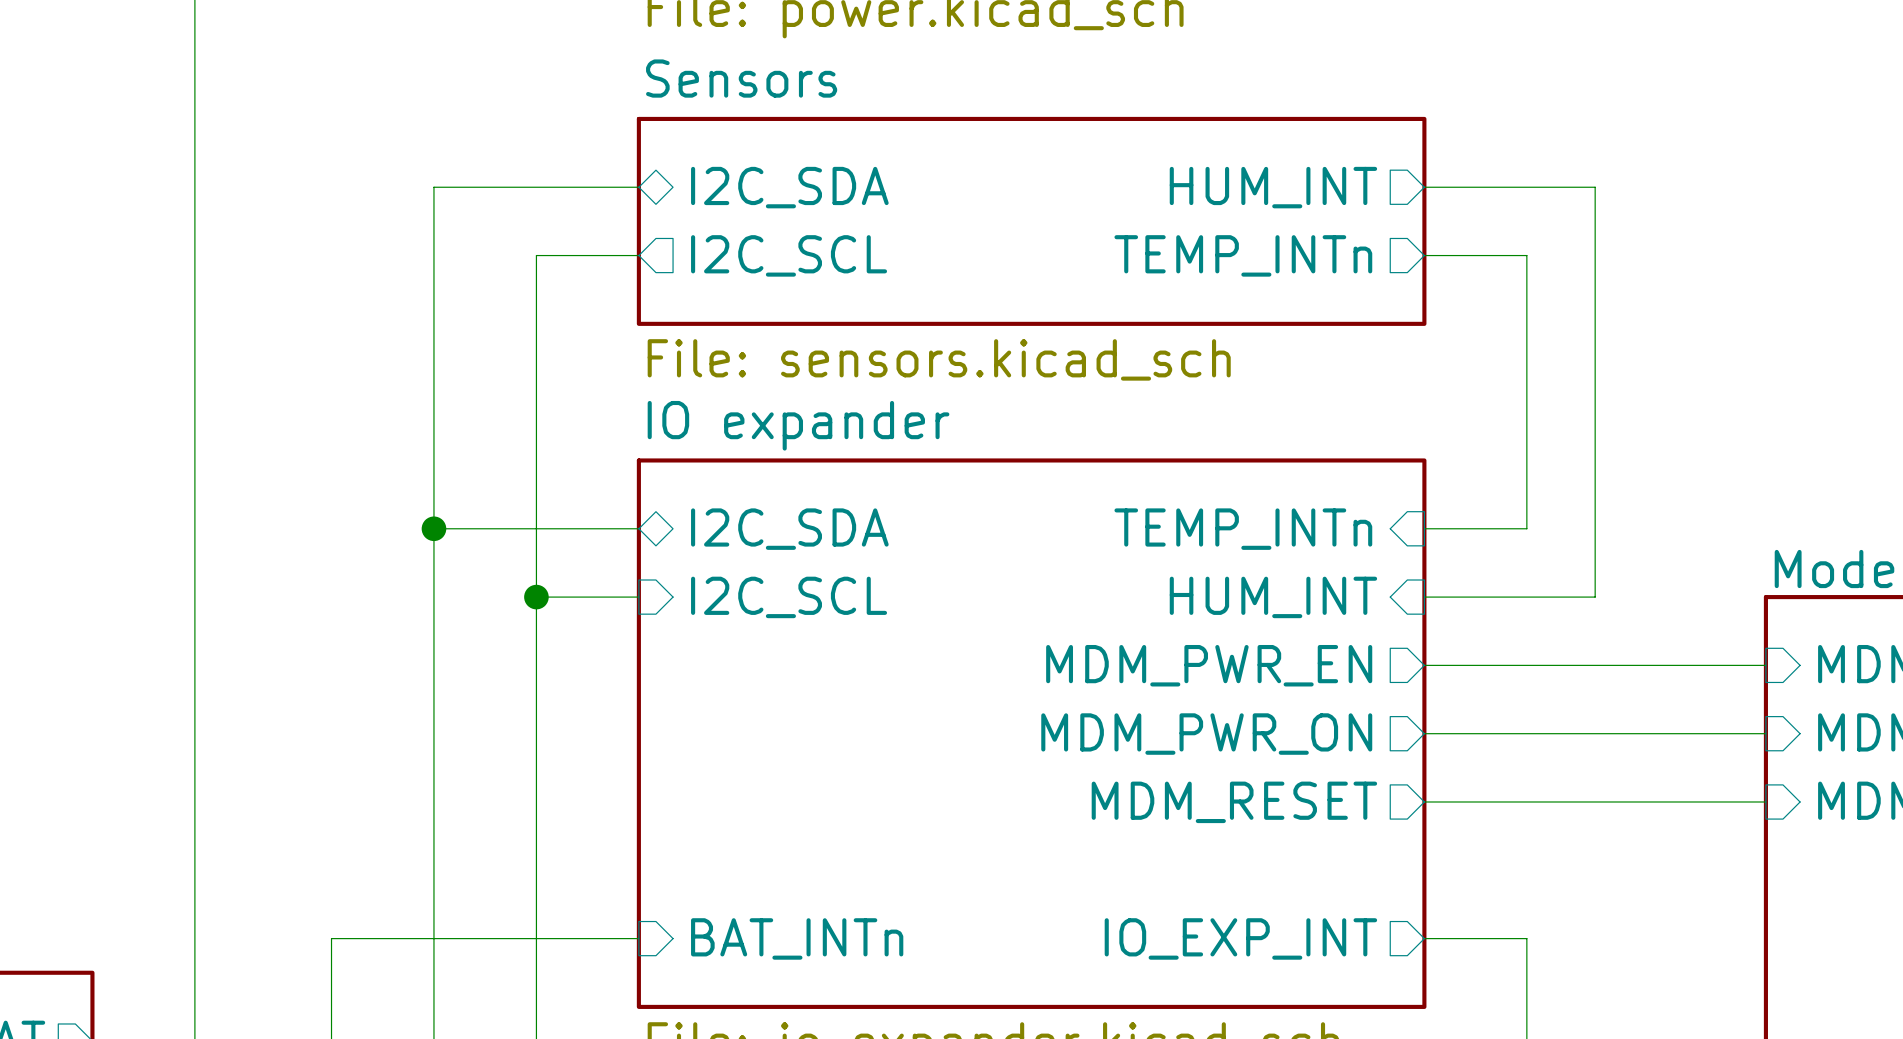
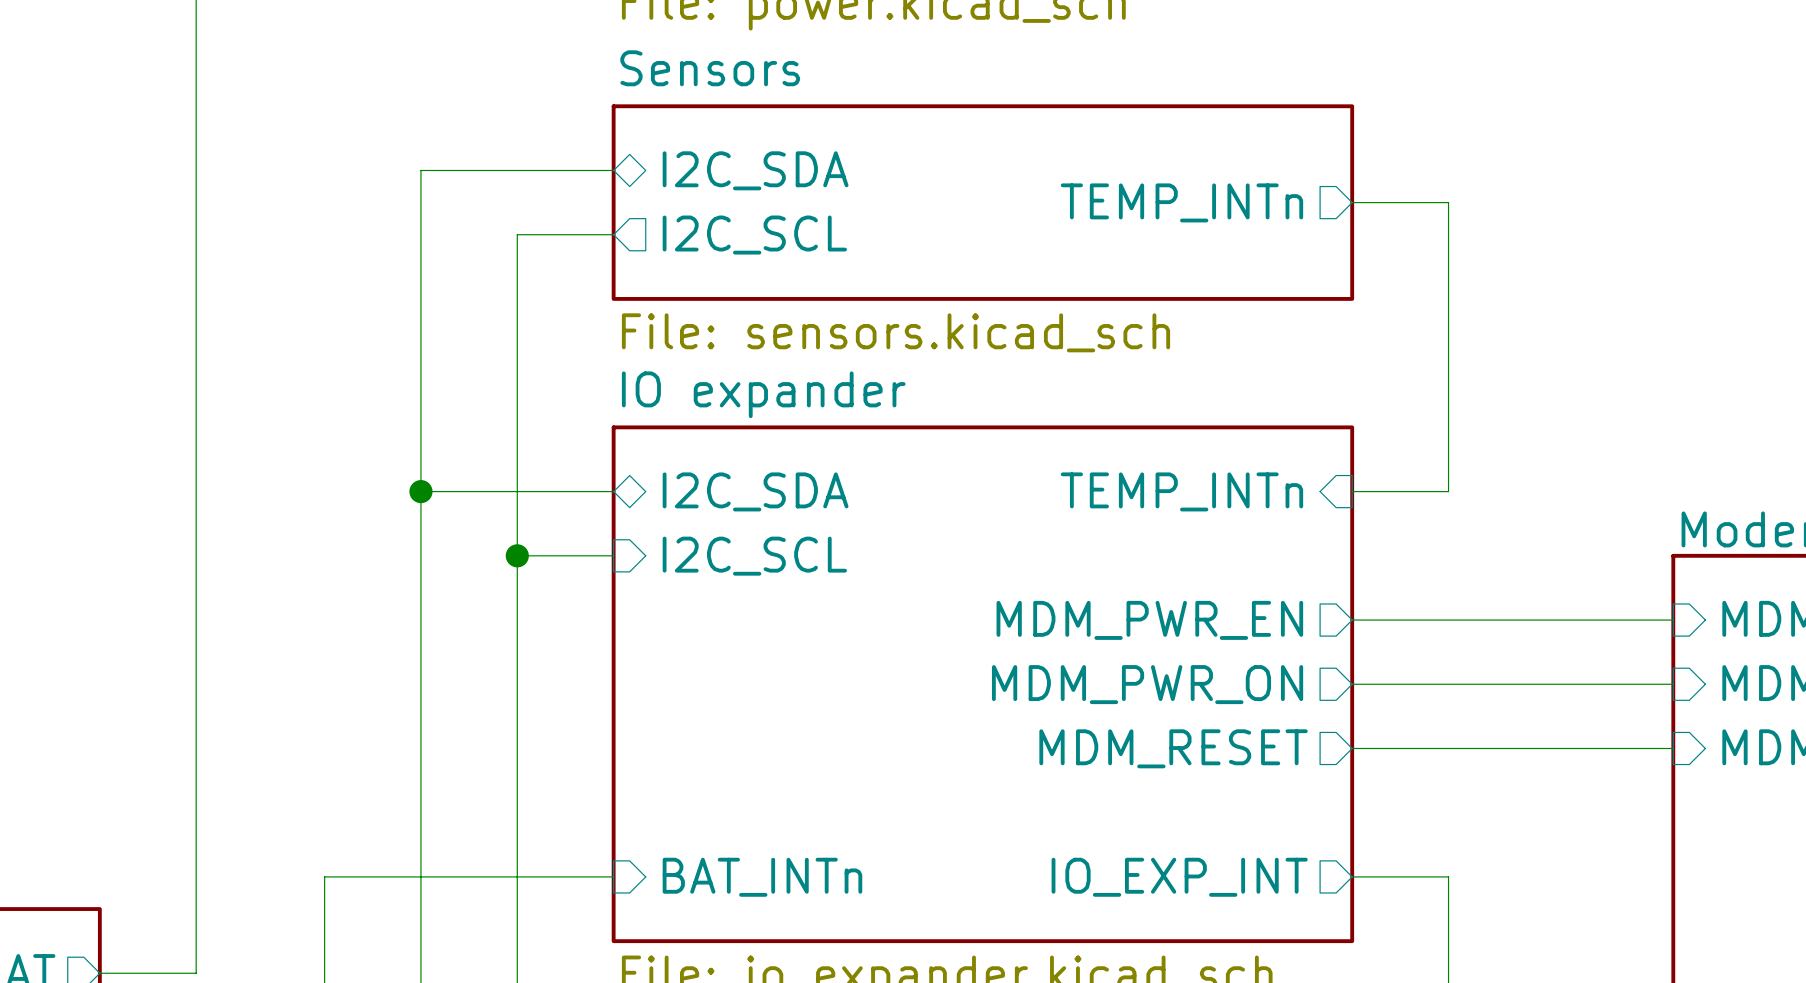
sheet pin: HUM_INT (1273, 187) -> none
wire: (1424, 187) (1595, 187) (1595, 597) (1424, 597) -> none
sheet pin position: TEMP_INTn (1243, 255) -> TEMP_INTn (1181, 202)
wire: (1424, 255) (1526, 255) -> (1352, 202) (1448, 202) (1448, 234)
sheet pin: HUM_INT (1273, 597) -> none

